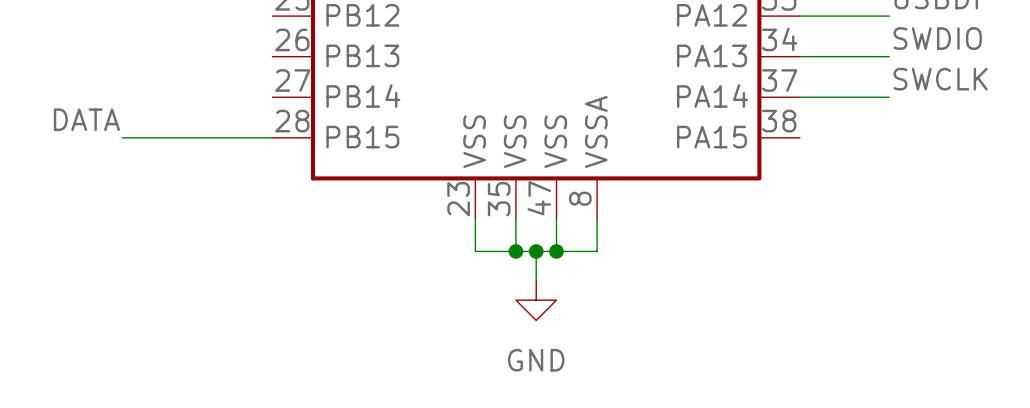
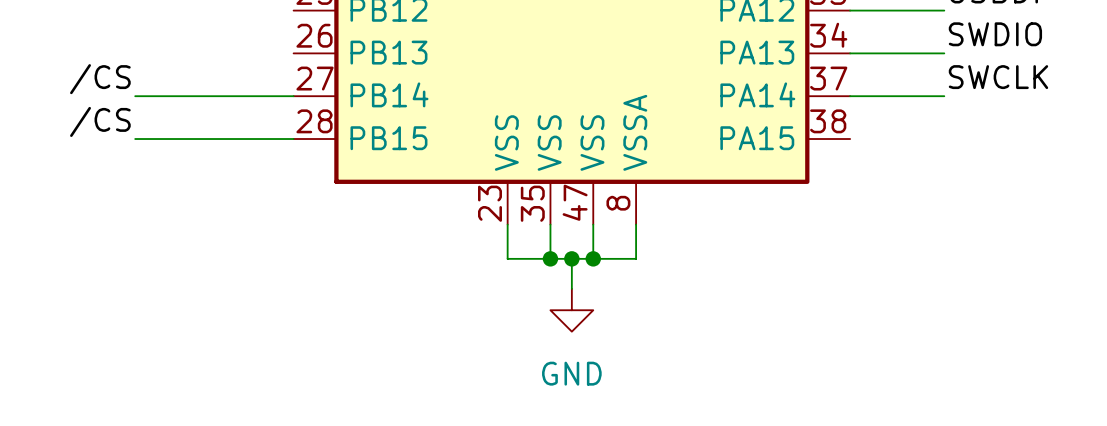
label: none -> /CS (100, 79)
wire: none -> (135, 96) (293, 96)
label: DATA (86, 119) -> /CS (100, 121)

